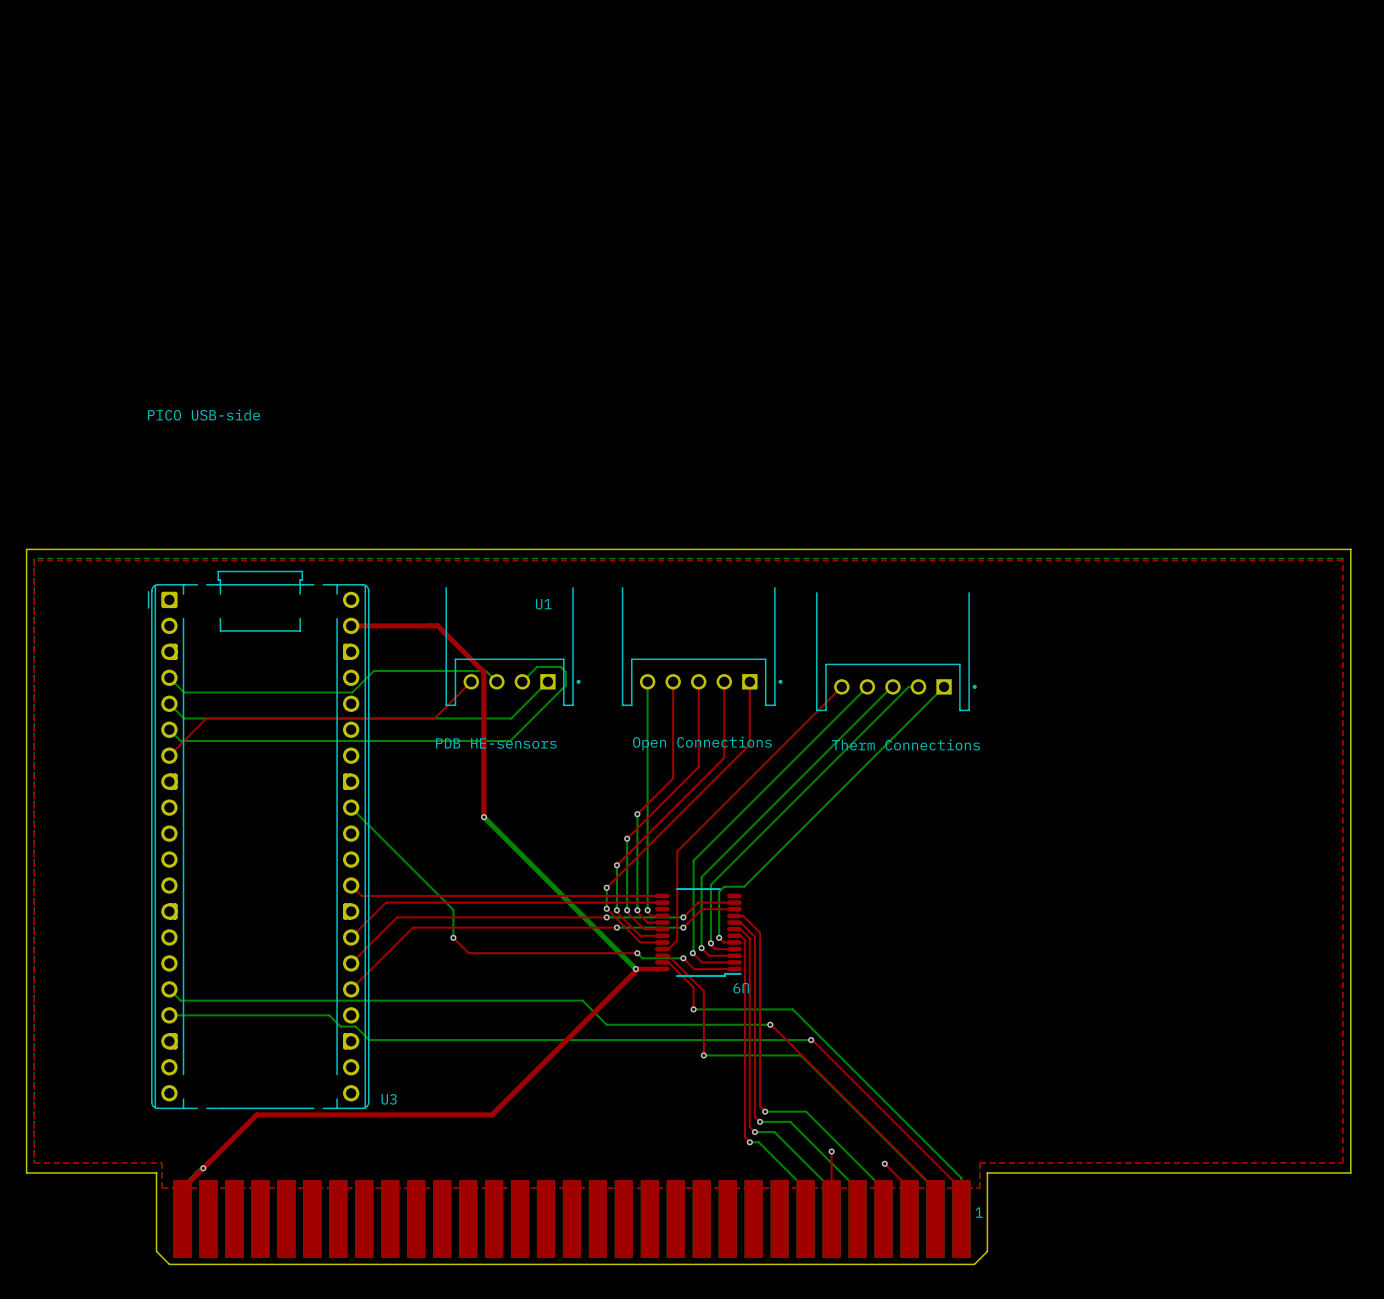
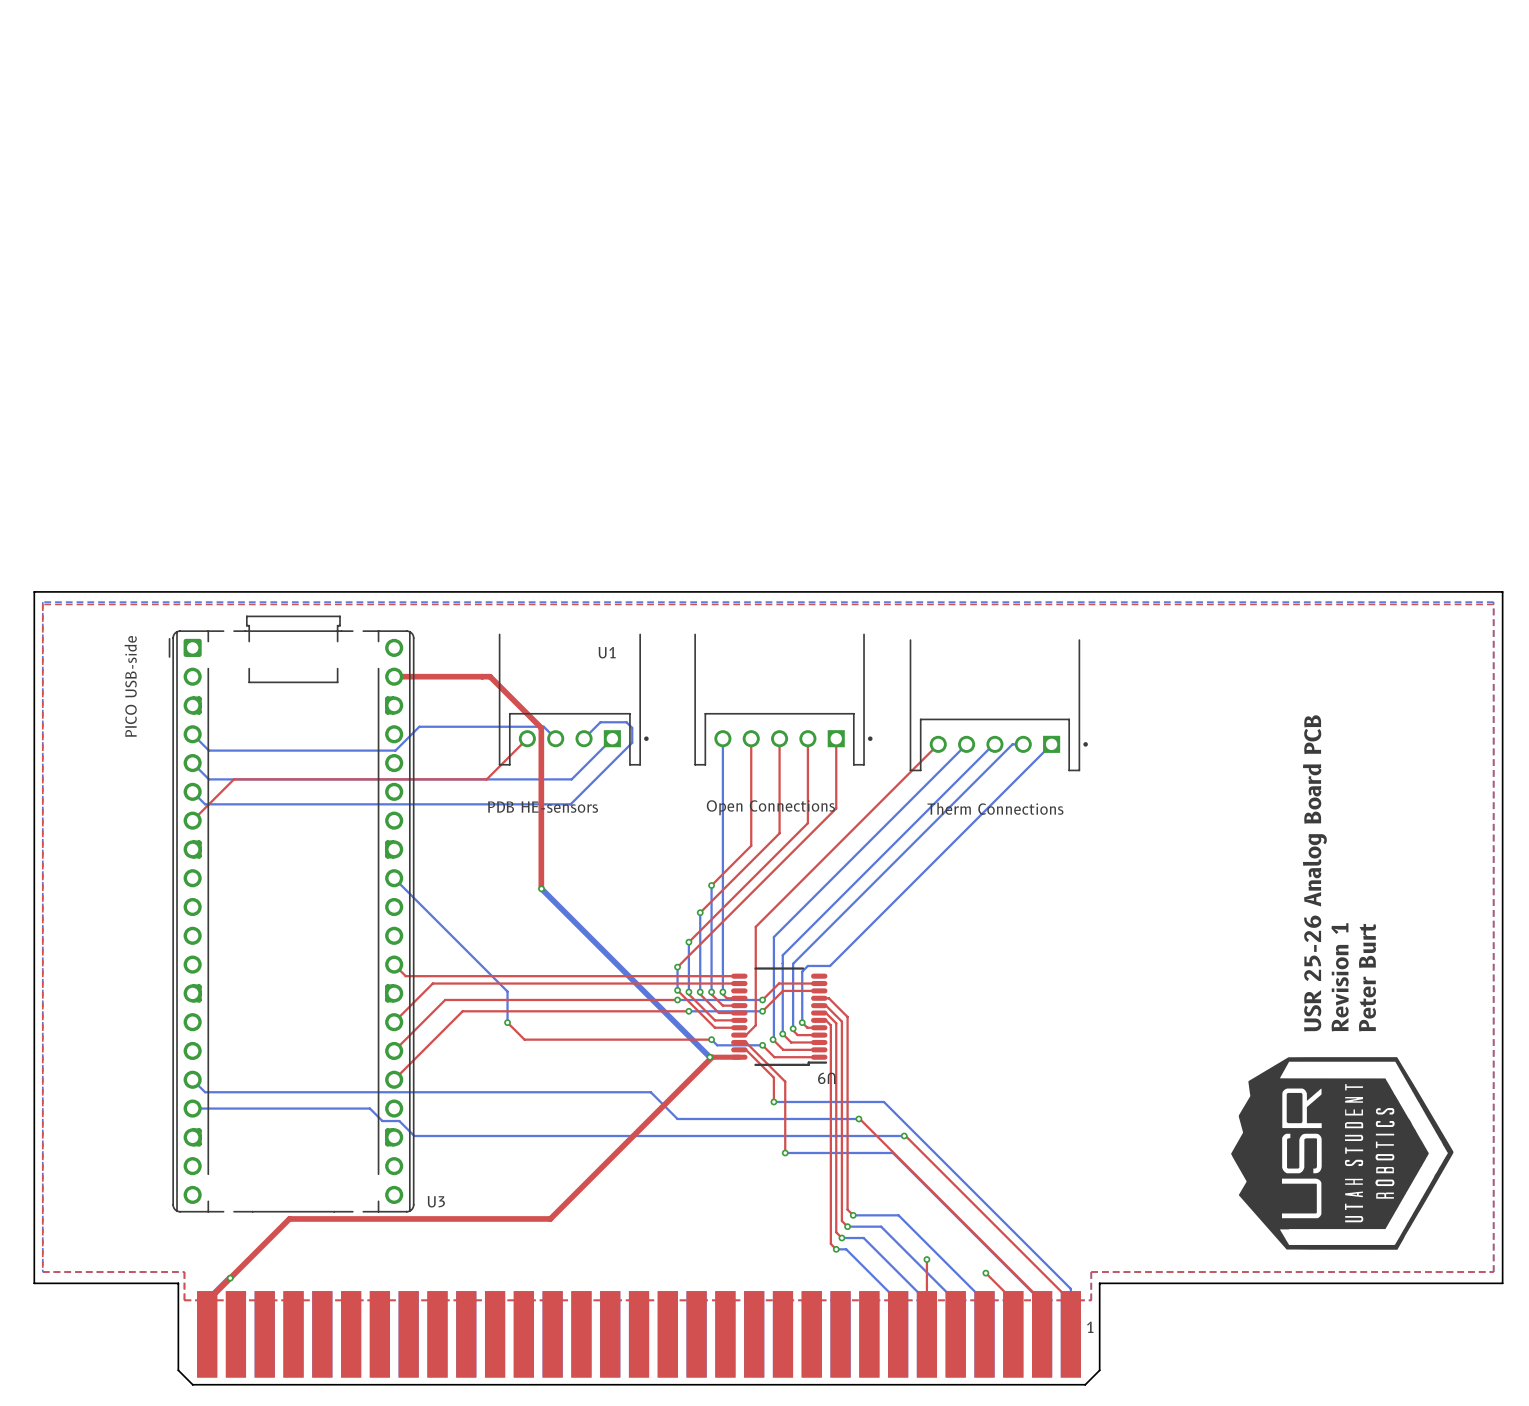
text: PICO USB-side (204, 414) -> none
text: none -> PICO USB-side (130, 686)
text: none -> USR 25-26 Analog Board PCB (1314, 873)
text: none -> Revision 1 (1340, 977)
text: none -> Peter Burt (1367, 977)
drawing: none -> [1231, 1057, 1454, 1250]

